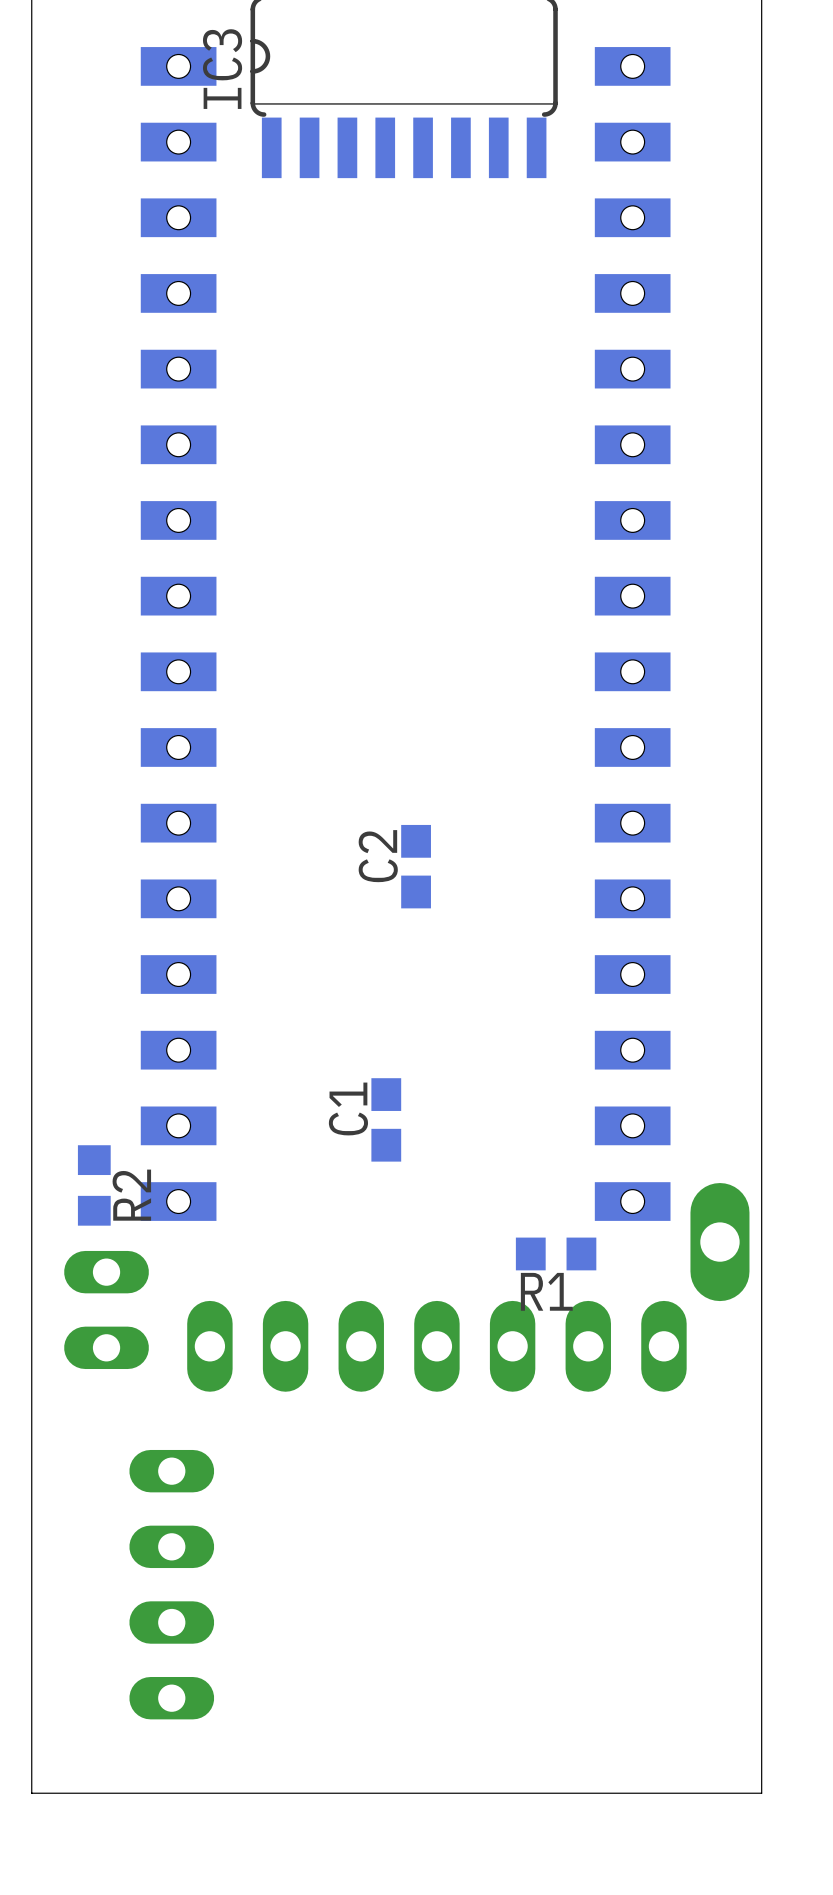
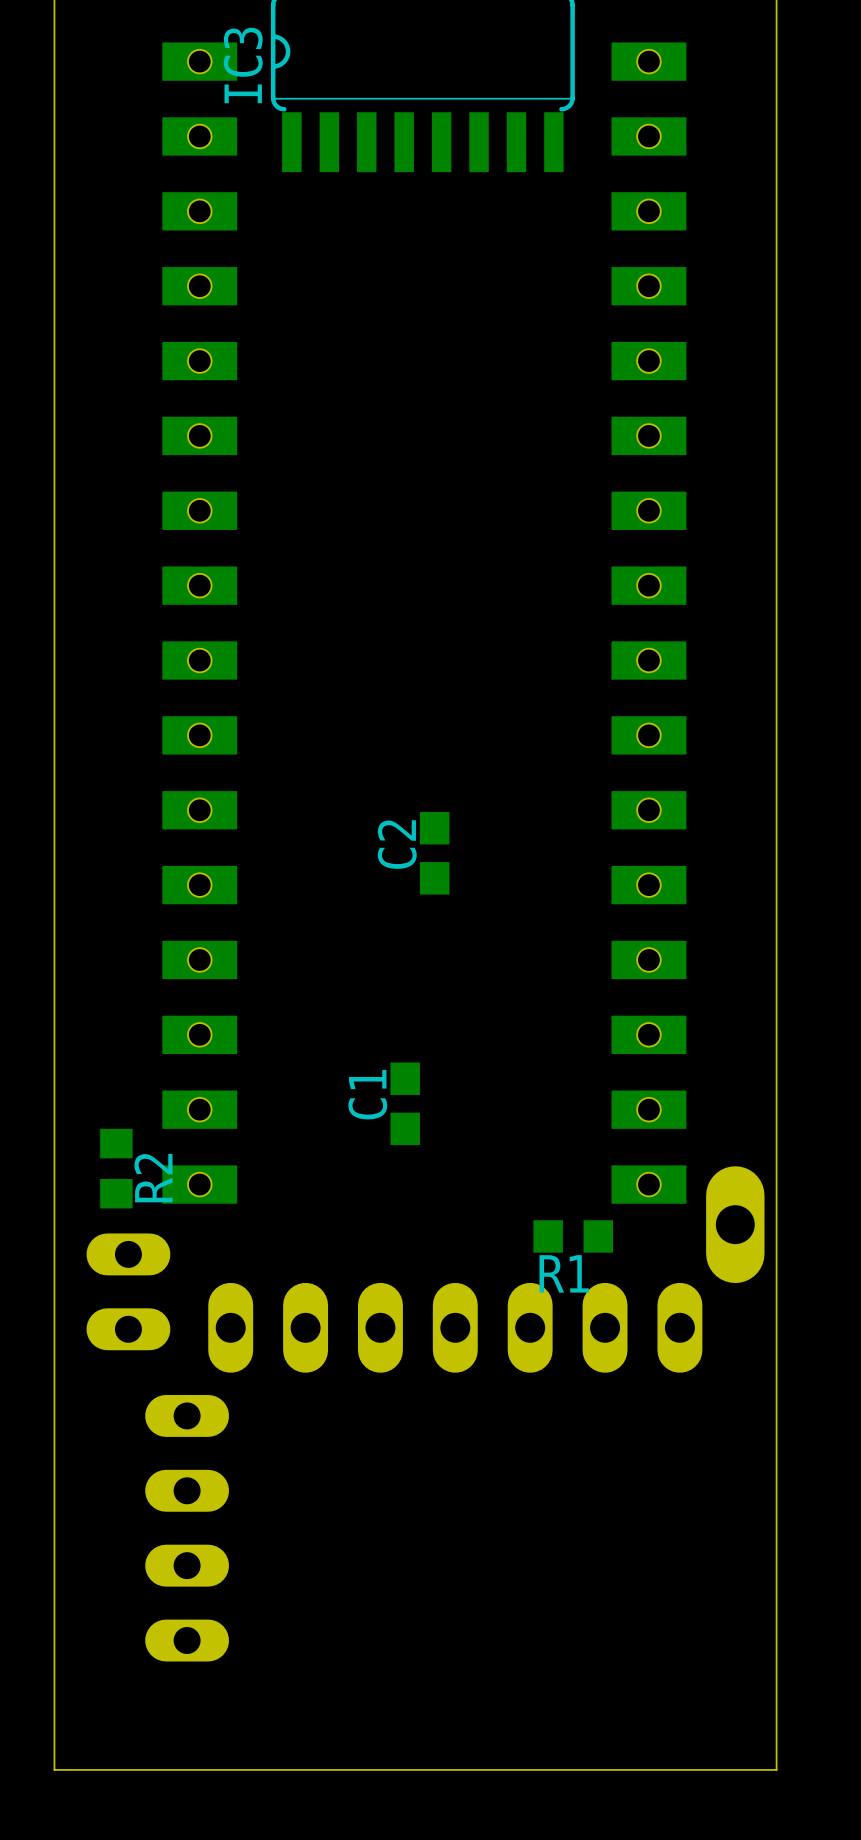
part position: (171, 1584) -> (187, 1528)

